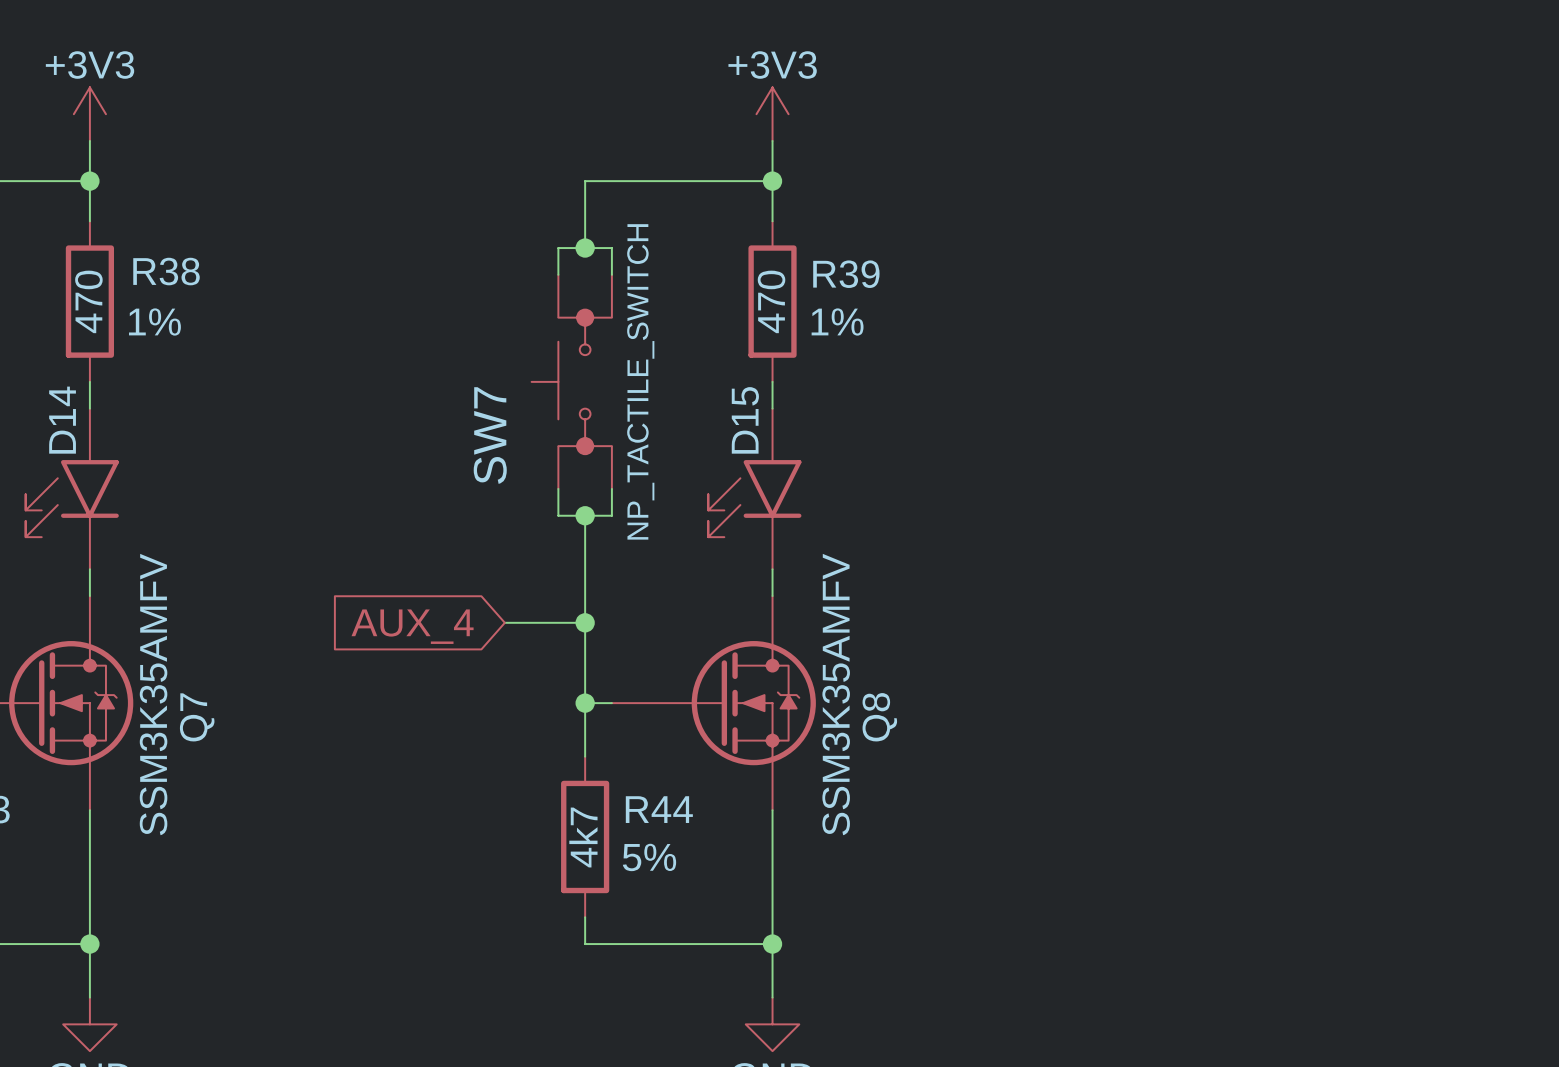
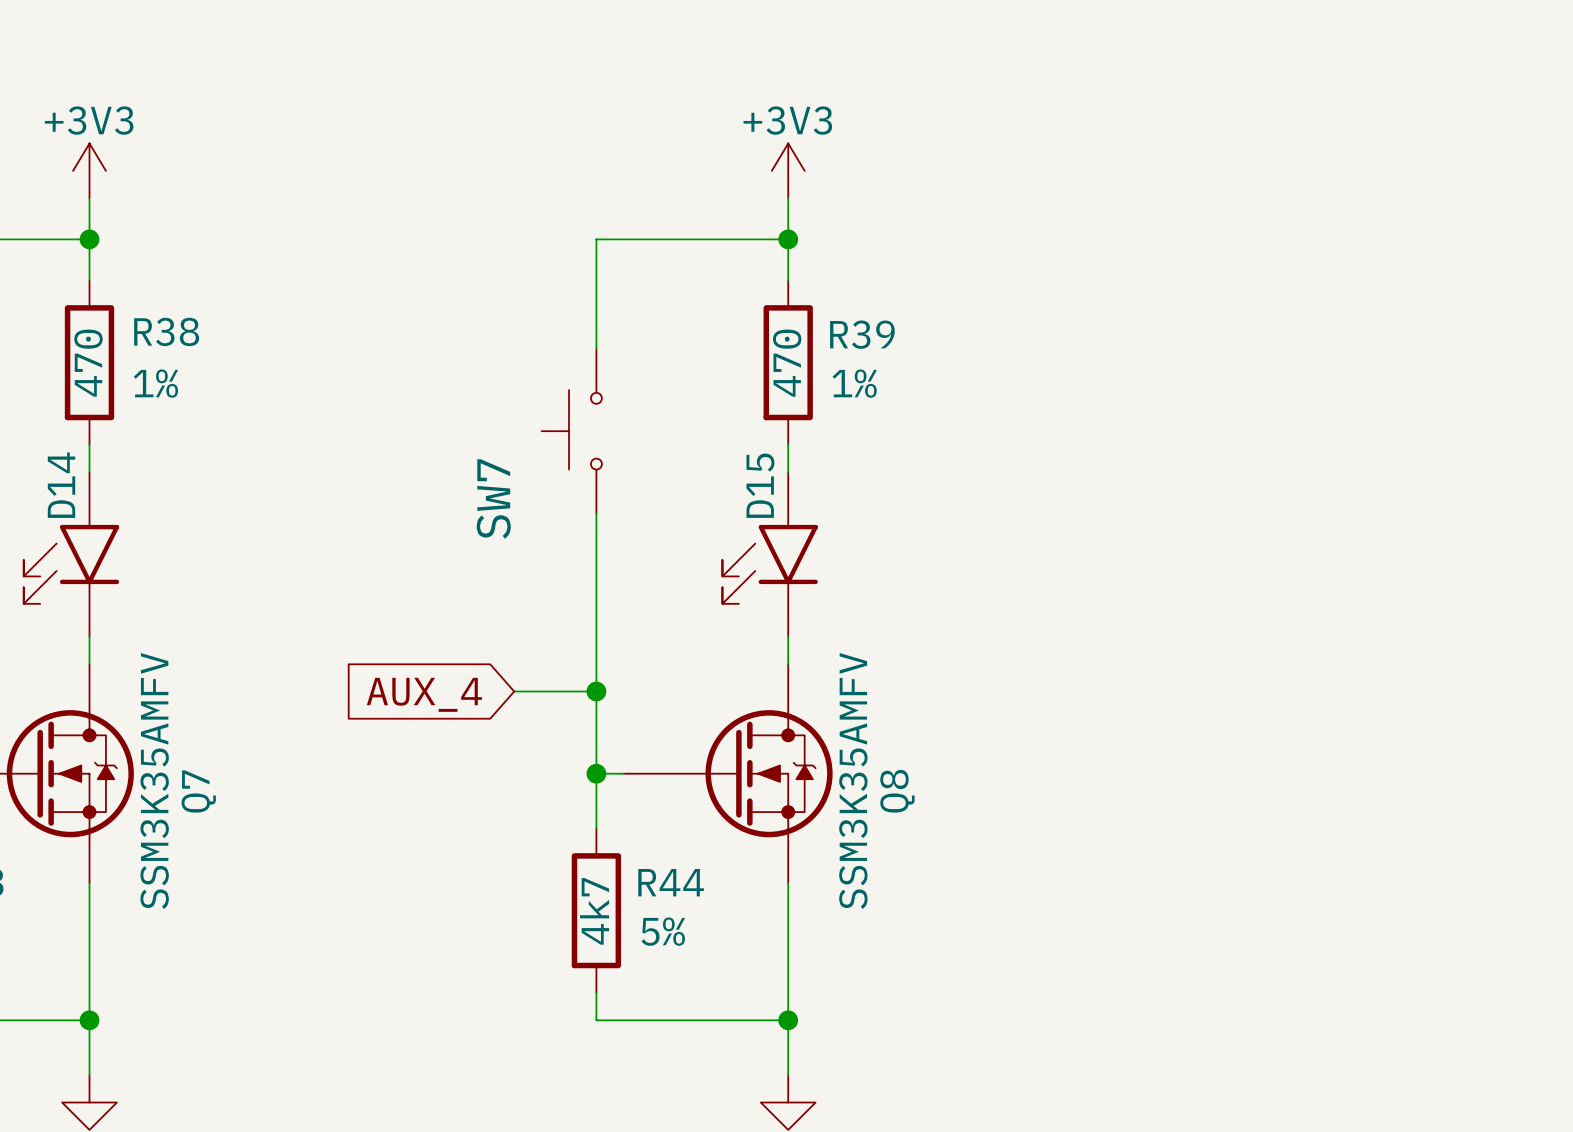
wire: none -> (596, 307) (596, 349)
junction: (585, 248) -> none
SW7 symbol: [531, 274, 612, 489] -> [541, 349, 602, 514]
wire: (558, 274) (558, 248) (611, 248) (611, 274) -> none
SW7 value: NP_TACTILE_SWITCH (640, 381) -> none
wire: none -> (596, 513) (596, 581)
wire: (558, 488) (558, 515) (611, 515) (611, 488) -> none
junction: (585, 515) -> none

